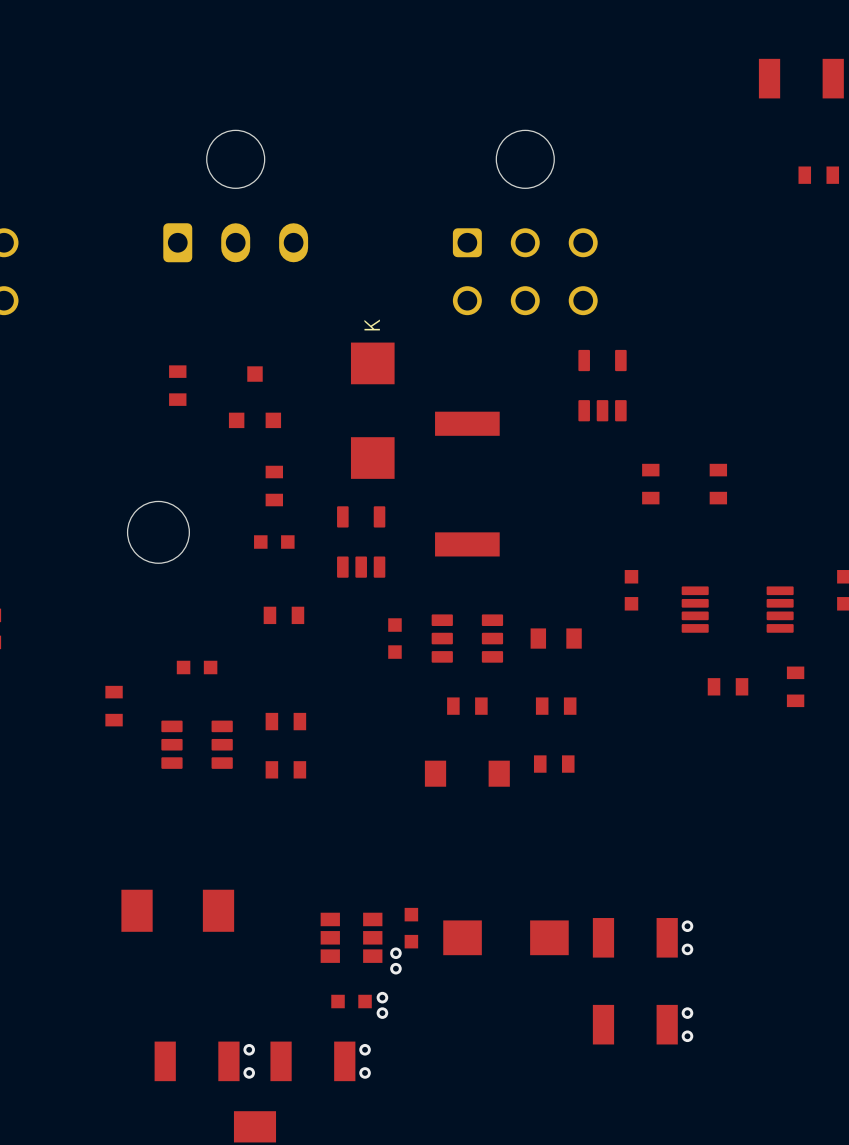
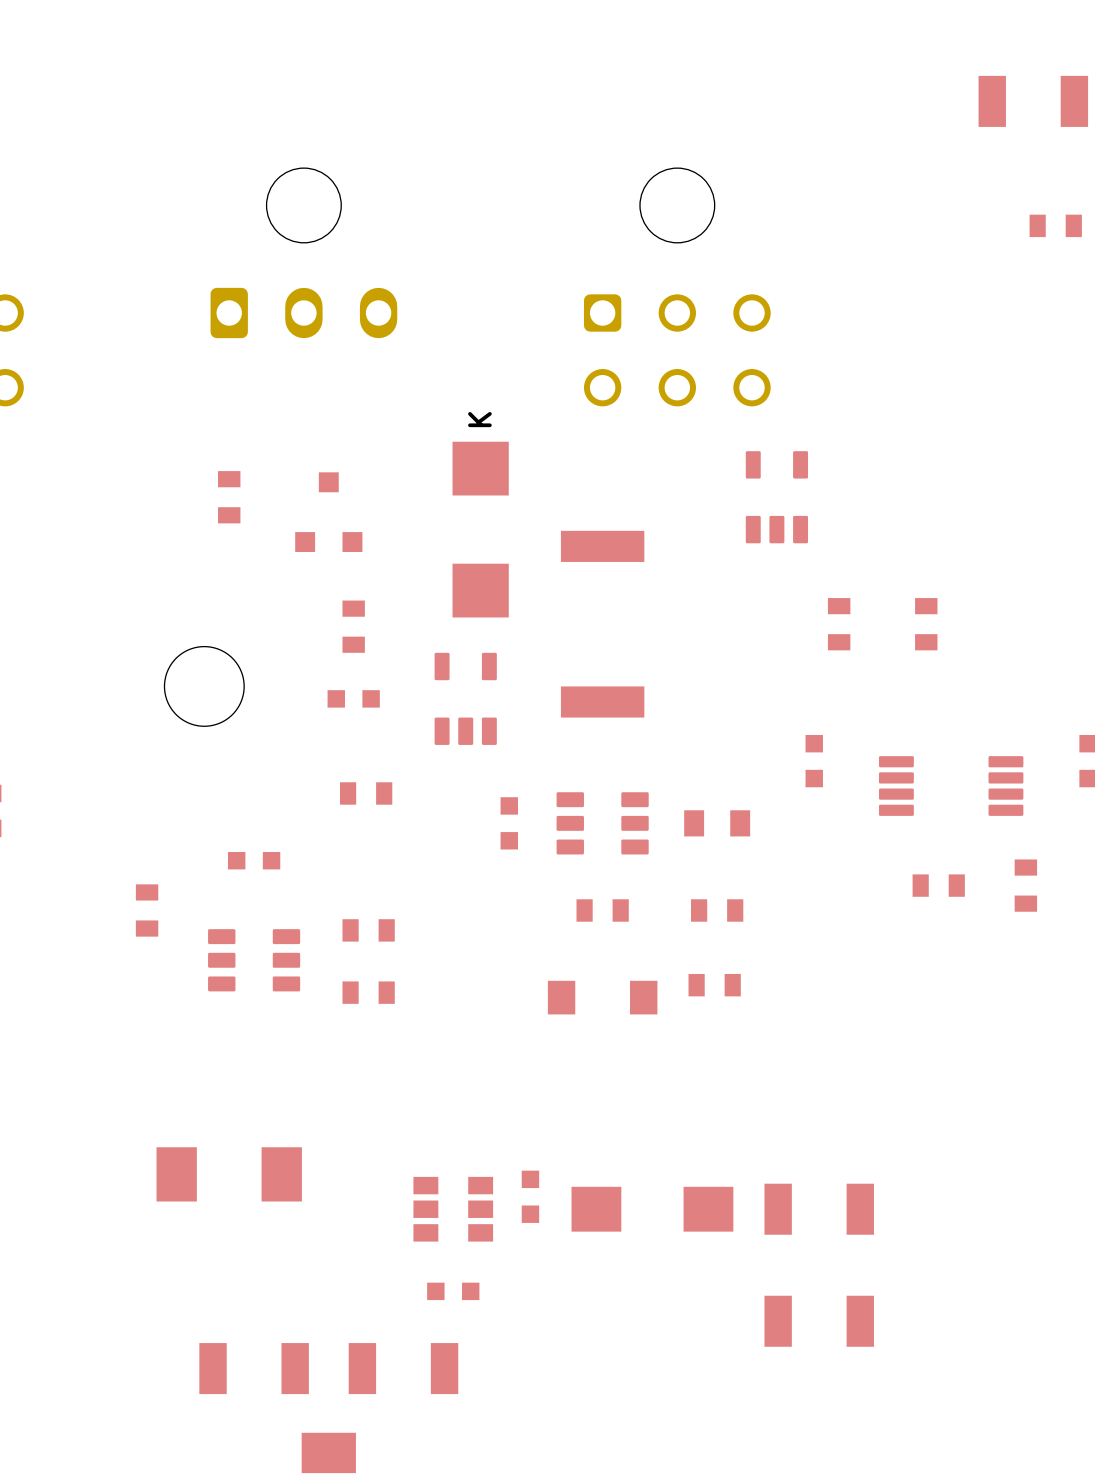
via: (687, 926) -> none
via: (687, 949) -> none
via: (395, 953) -> none
via: (395, 968) -> none
via: (382, 997) -> none
via: (382, 1013) -> none
via: (687, 1013) -> none
via: (687, 1036) -> none
via: (249, 1049) -> none
via: (365, 1049) -> none
via: (249, 1072) -> none
via: (365, 1072) -> none

